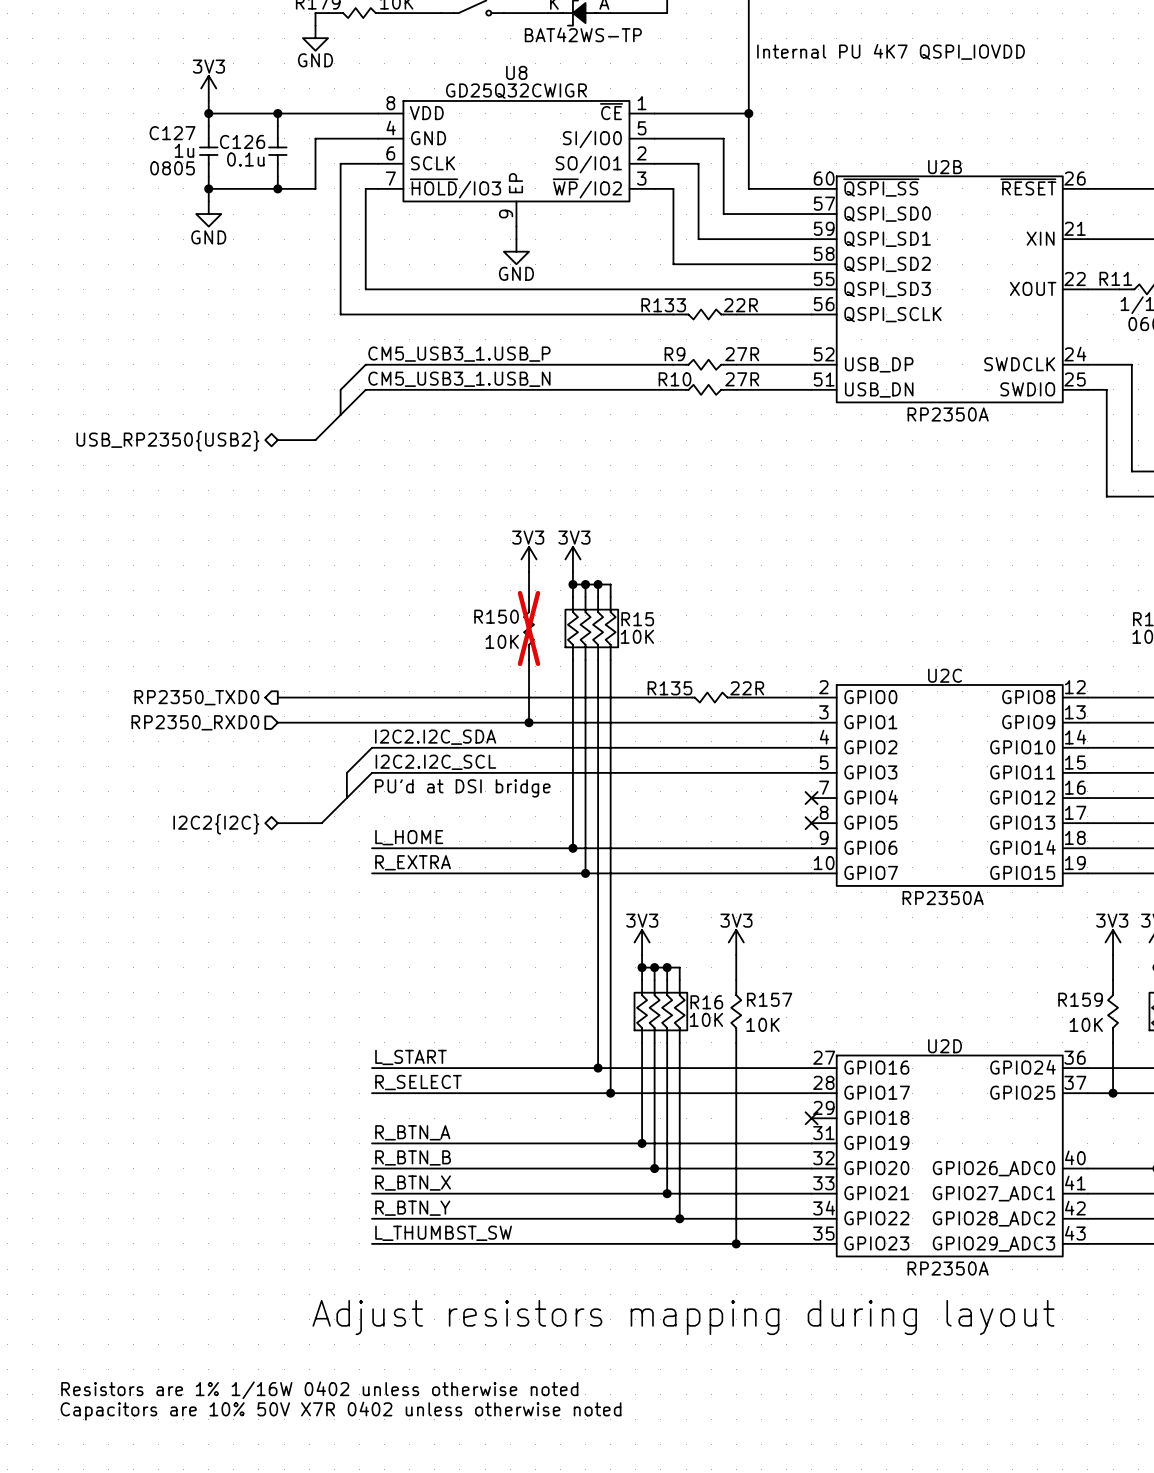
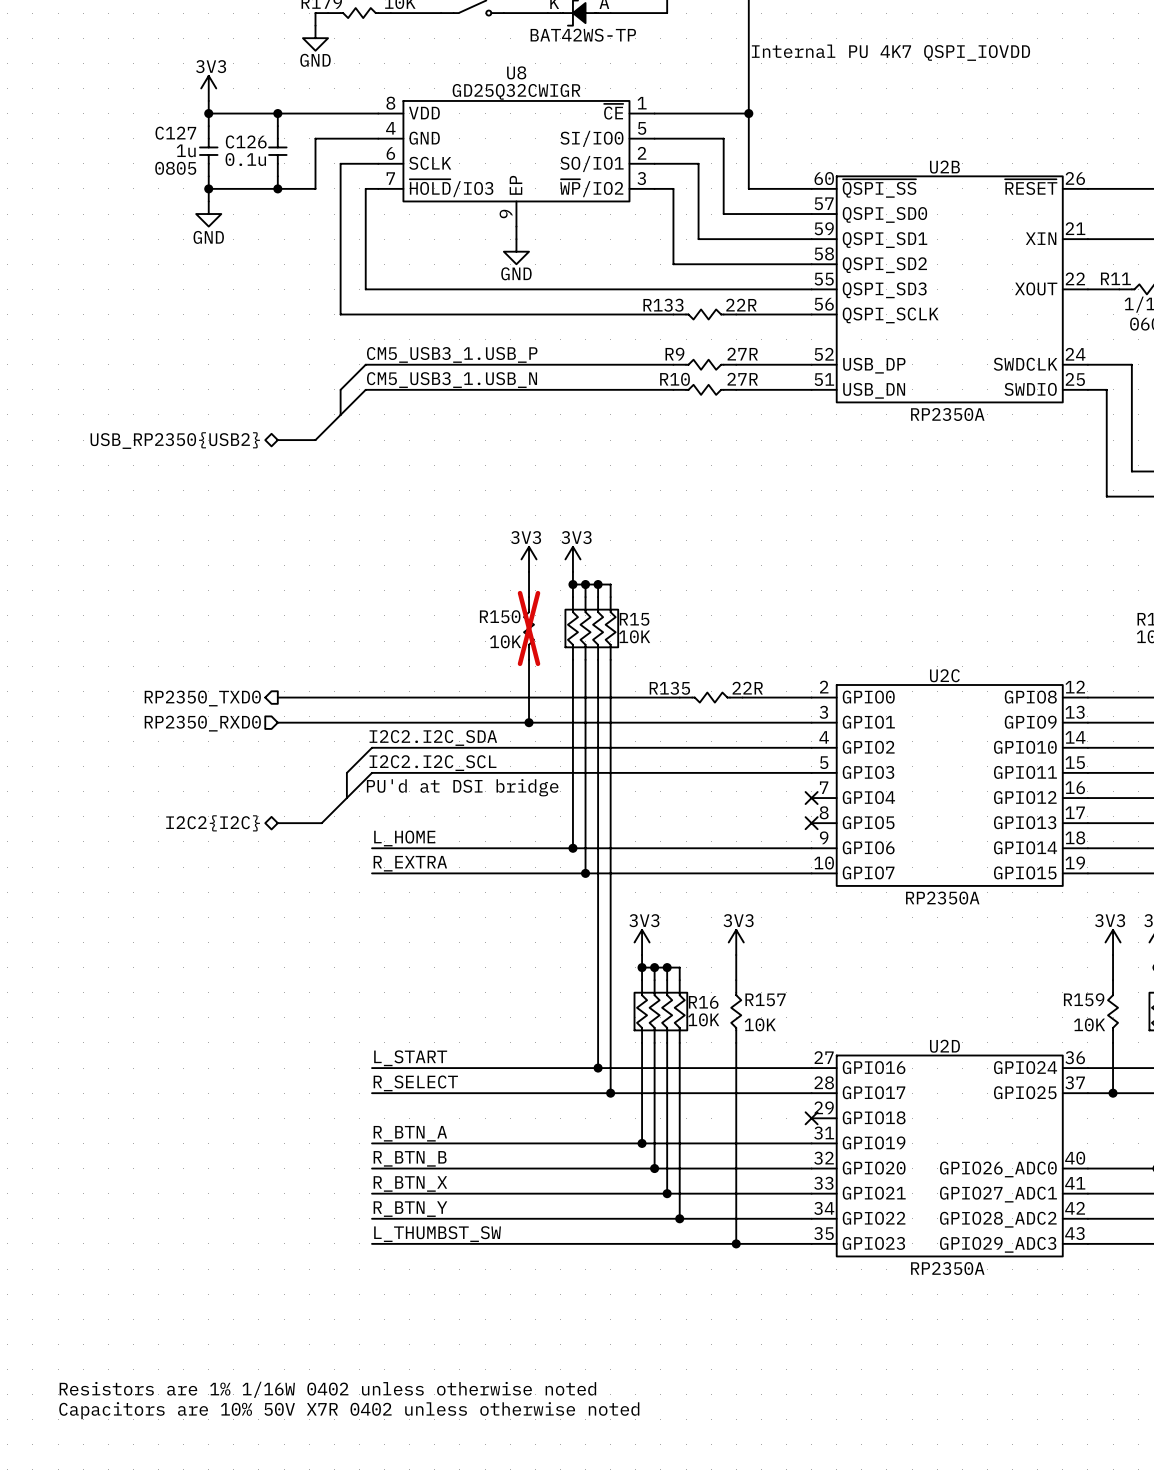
text: Adjust resistors mapping during layout (683, 1317) -> none

